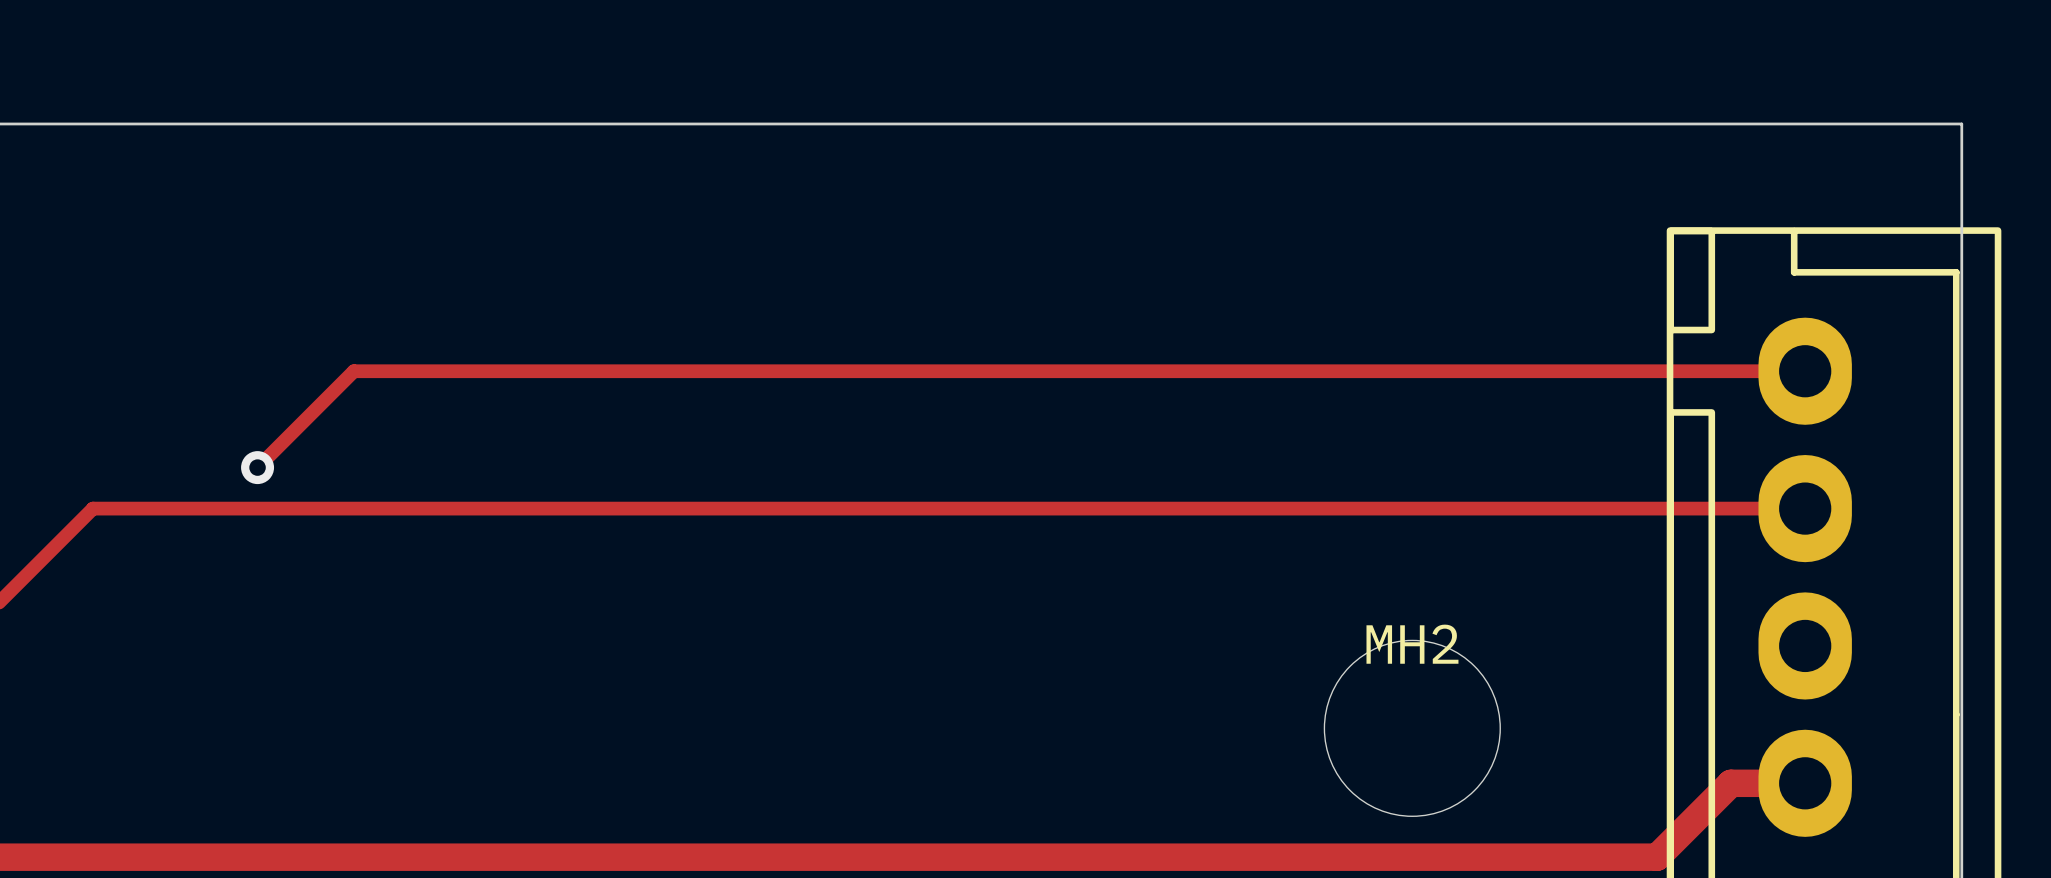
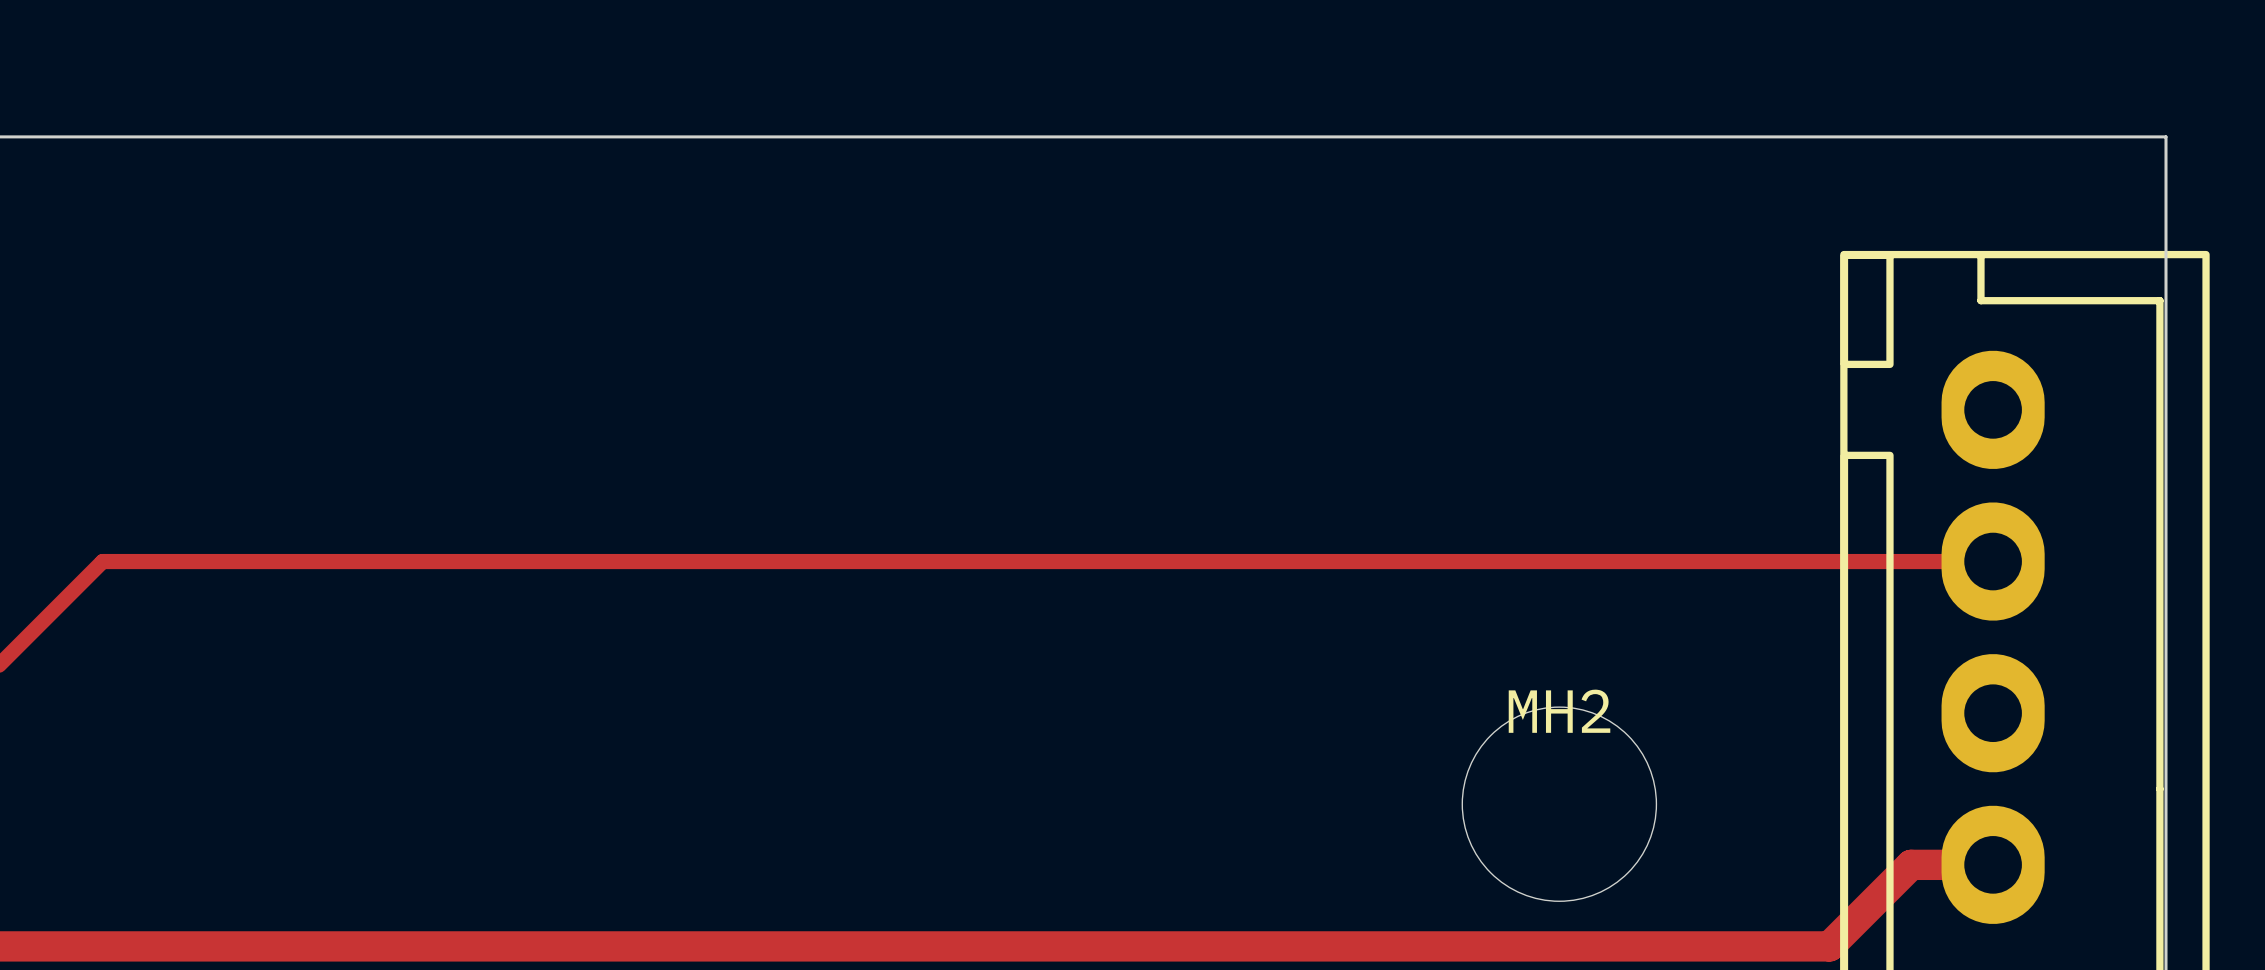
track: (1805, 371) (353, 371) (257, 467) -> none
via: (257, 467) -> none

